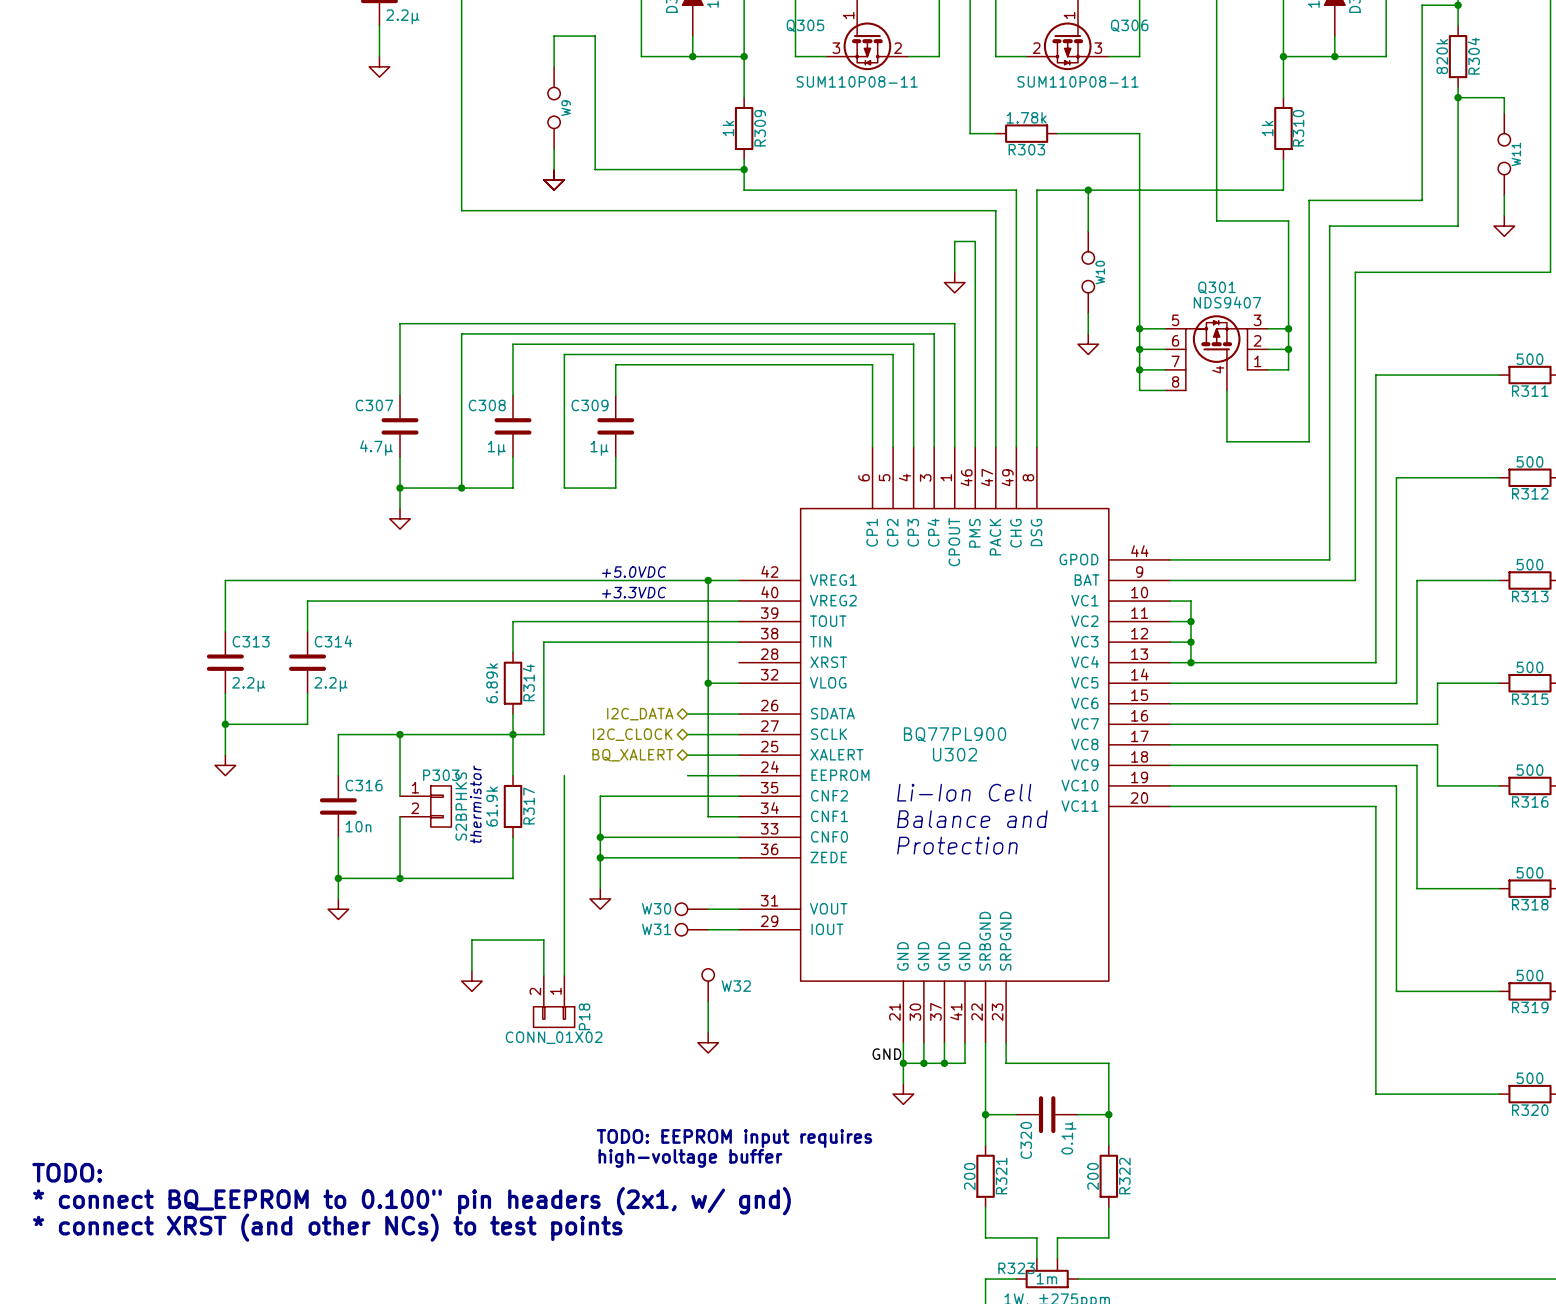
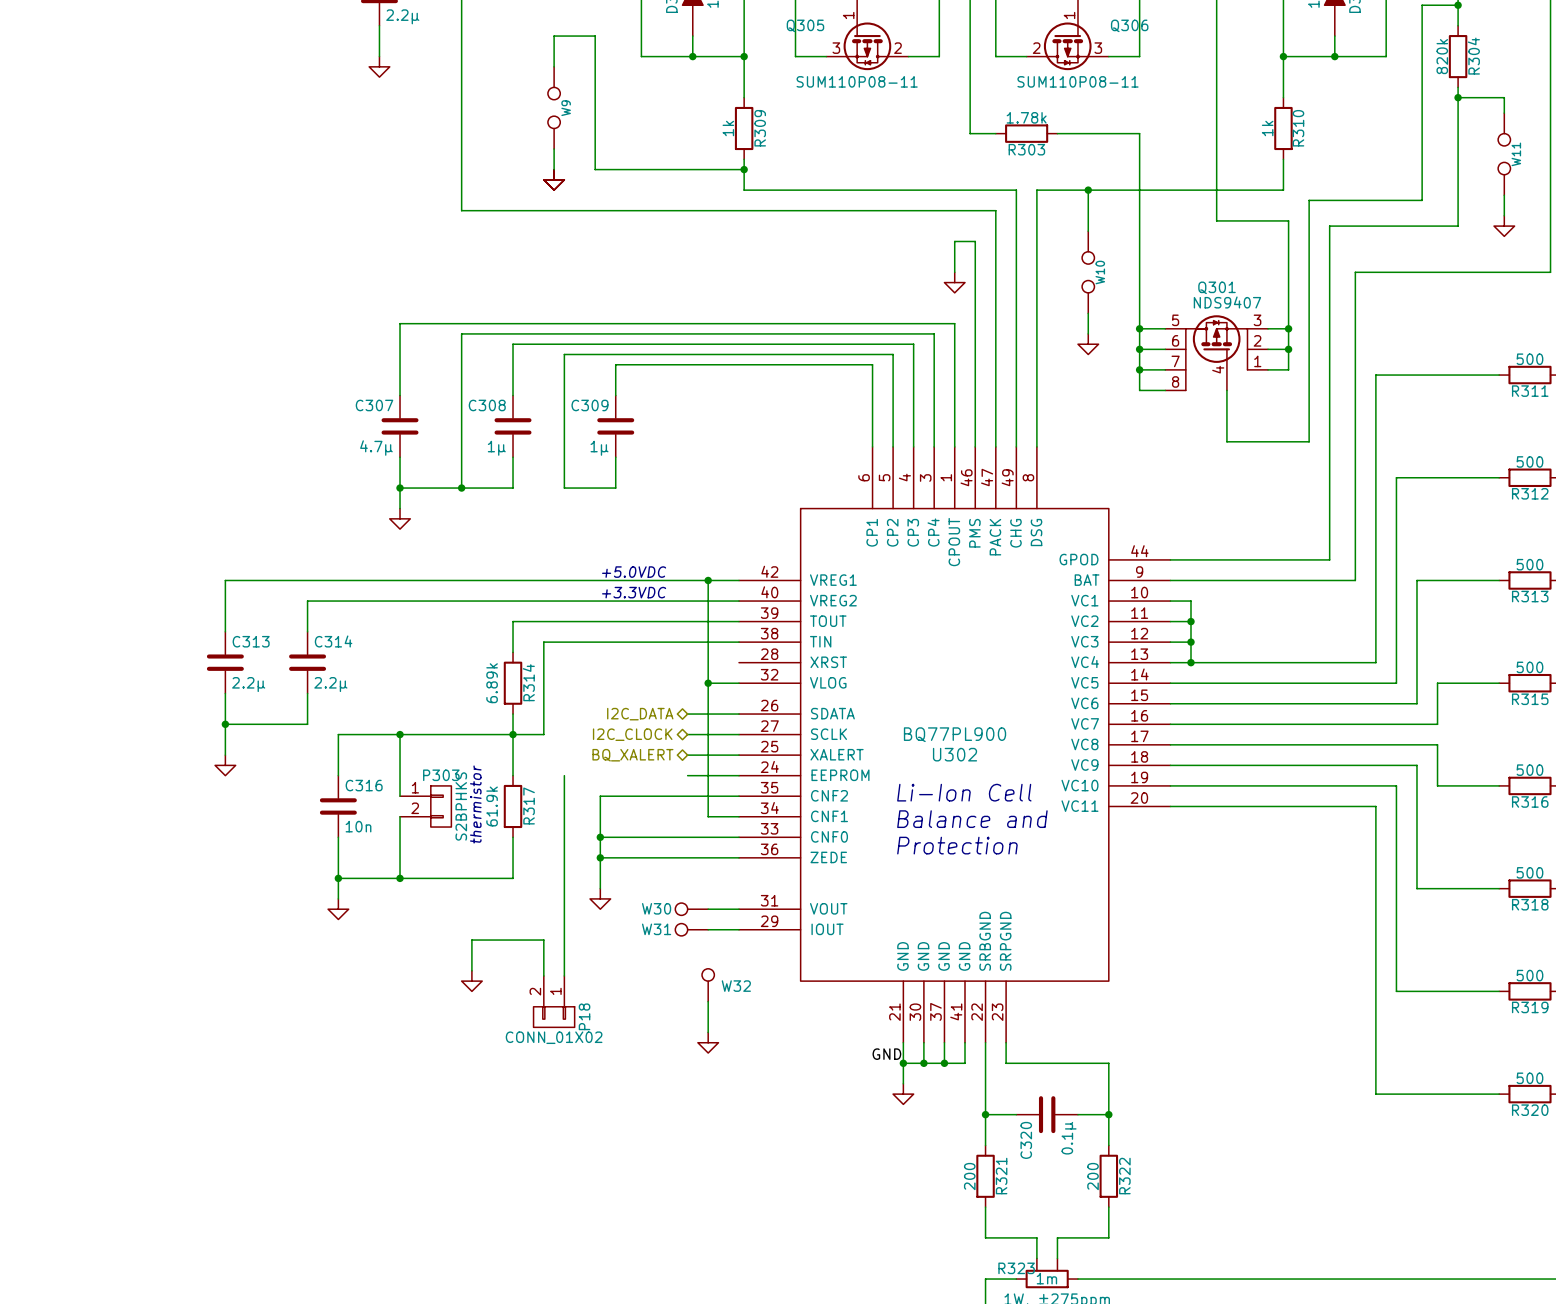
text: TODO: EEPROM input requires (734, 1138) -> none
text: high-voltage buffer (690, 1158) -> none
text: TODO: (67, 1172) -> none
text: * connect BQ_EEPROM to 0.100" pin headers (2x1, w/ gnd) (411, 1201) -> none
text: * connect XRST (and other NCs) to test points (327, 1227) -> none

